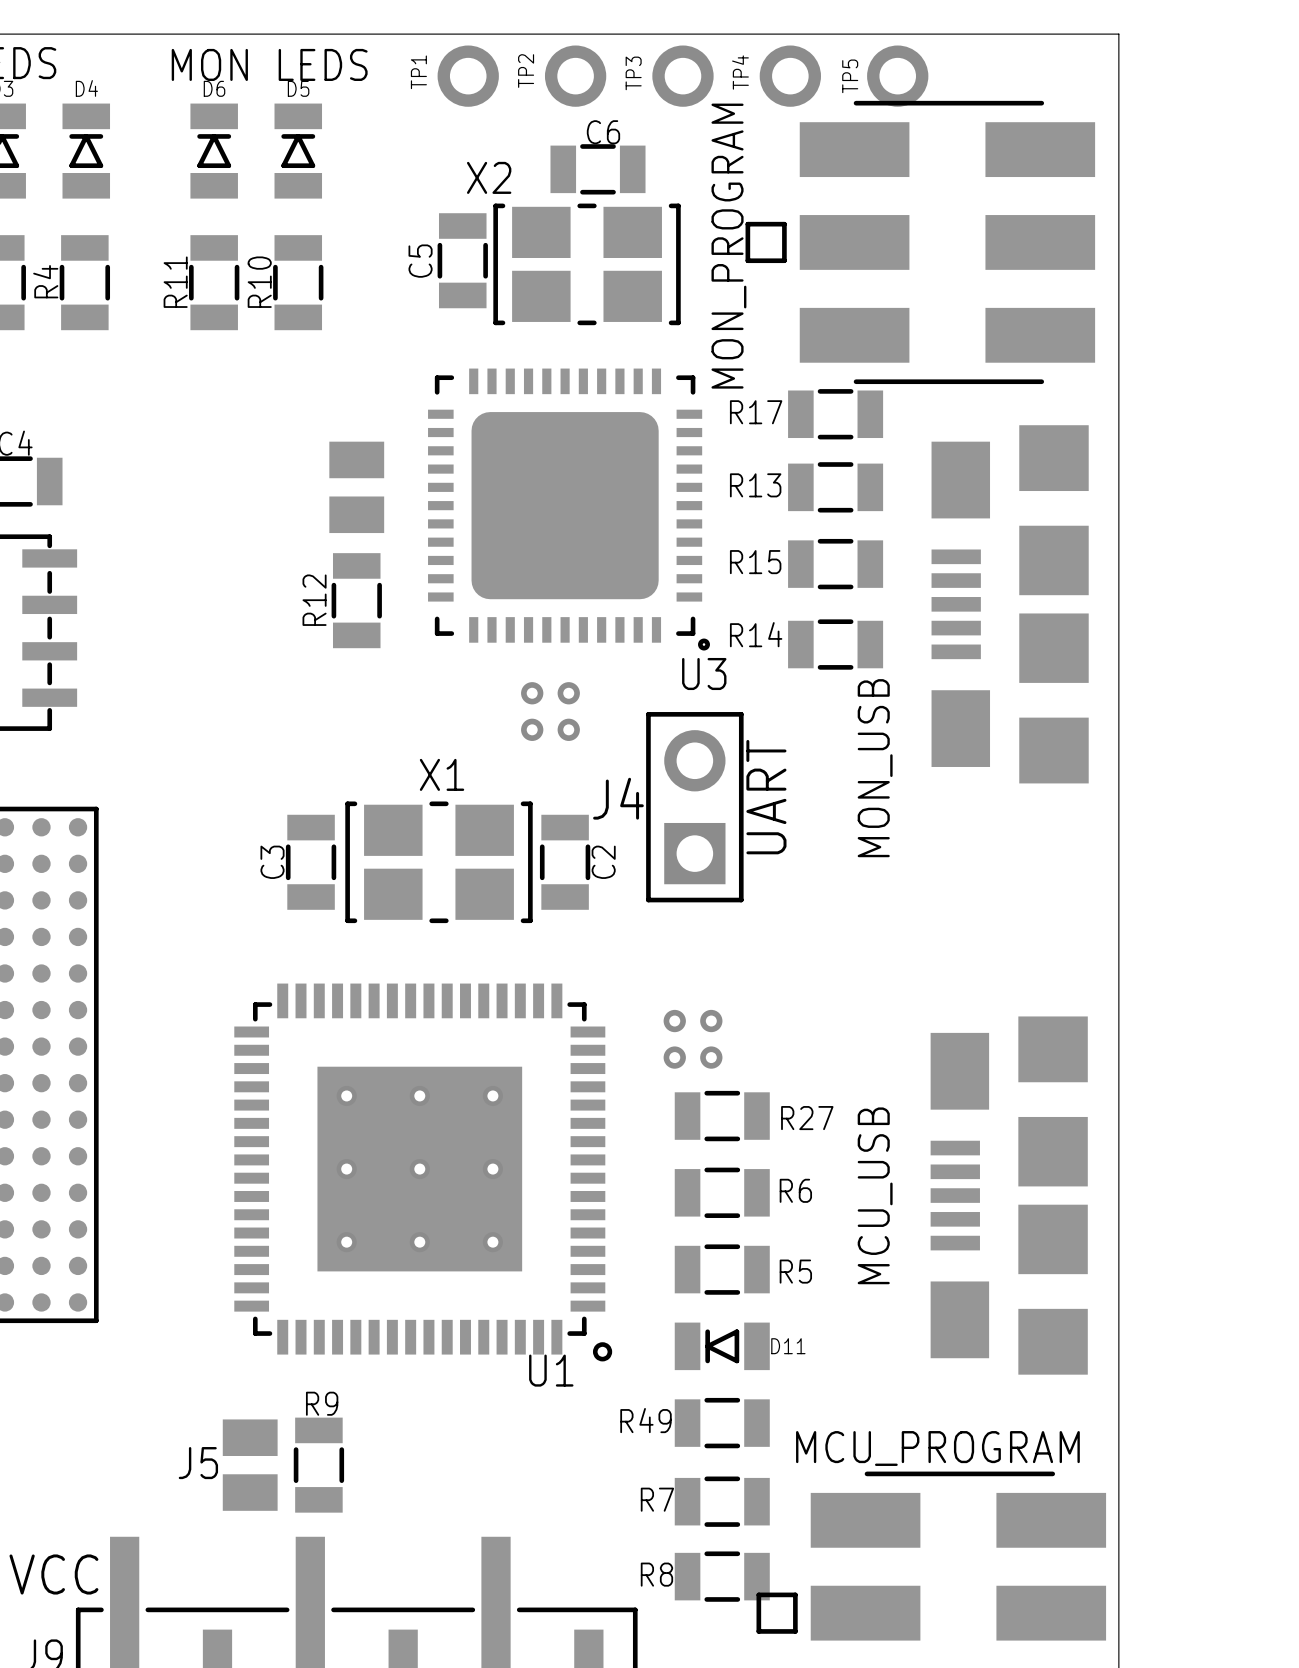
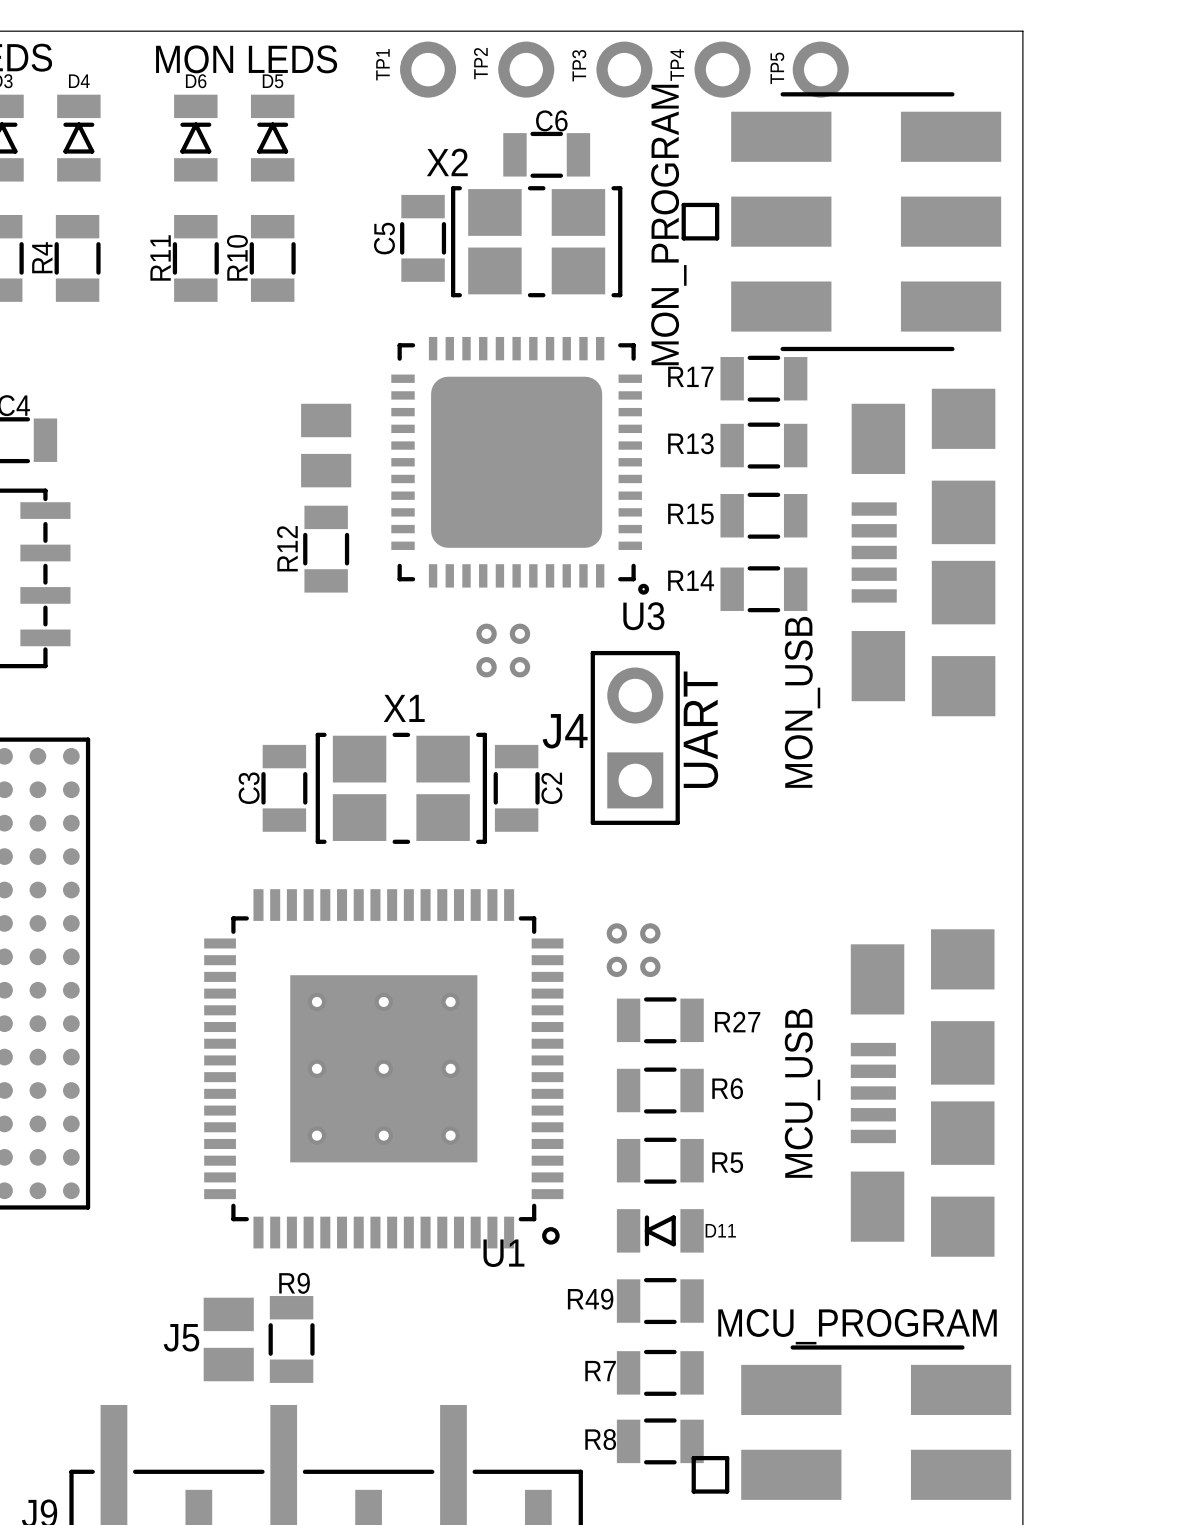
U1 footprint: [234, 983, 613, 1362] -> [204, 889, 564, 1249]
text: VCC (53, 1574) -> none

